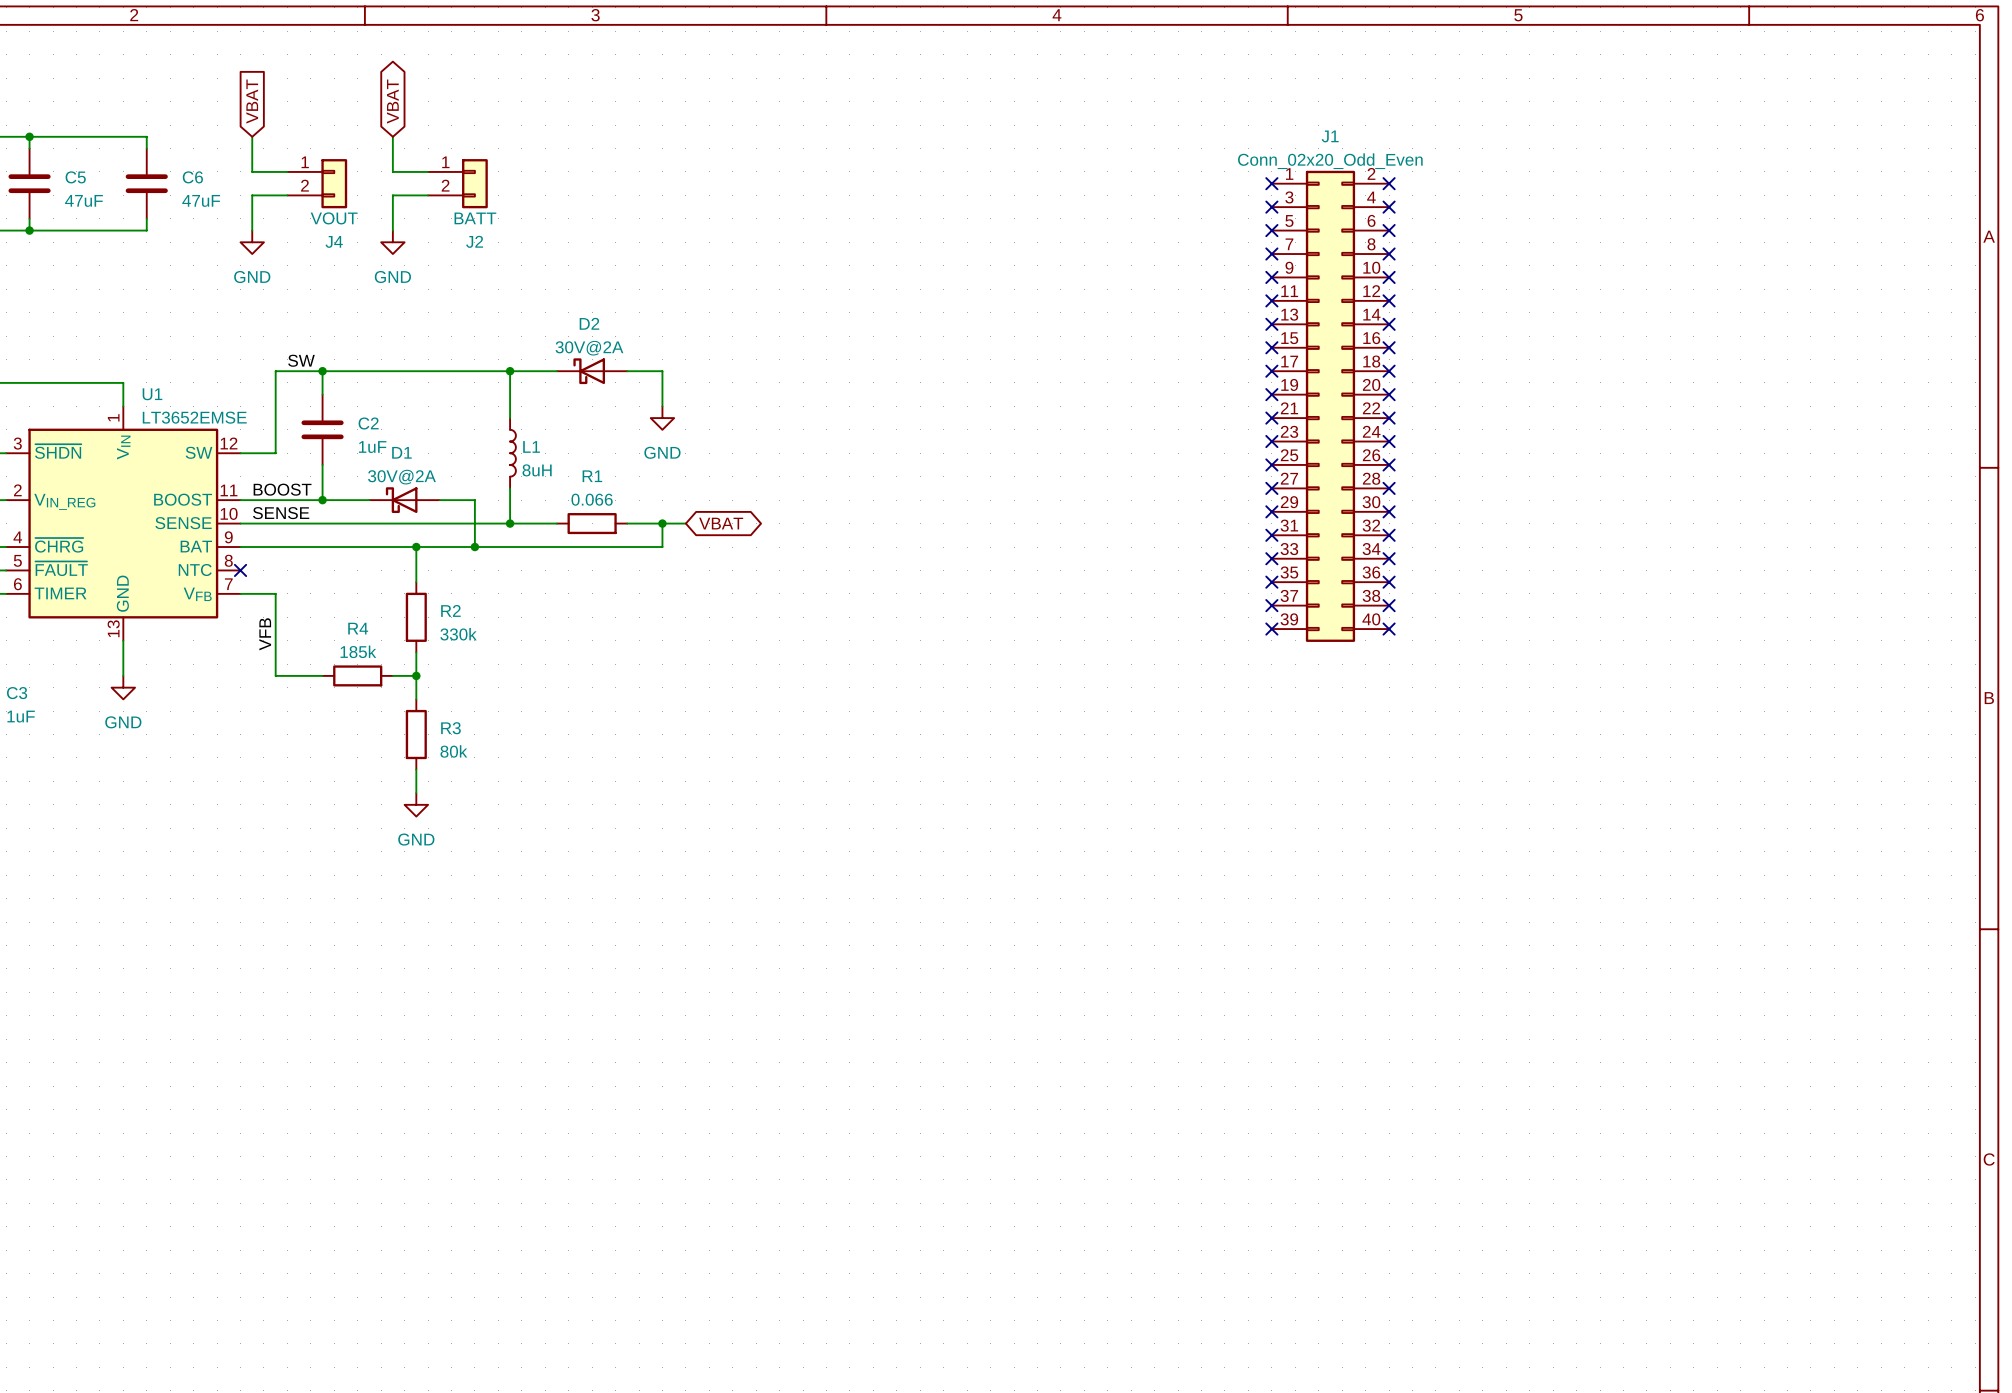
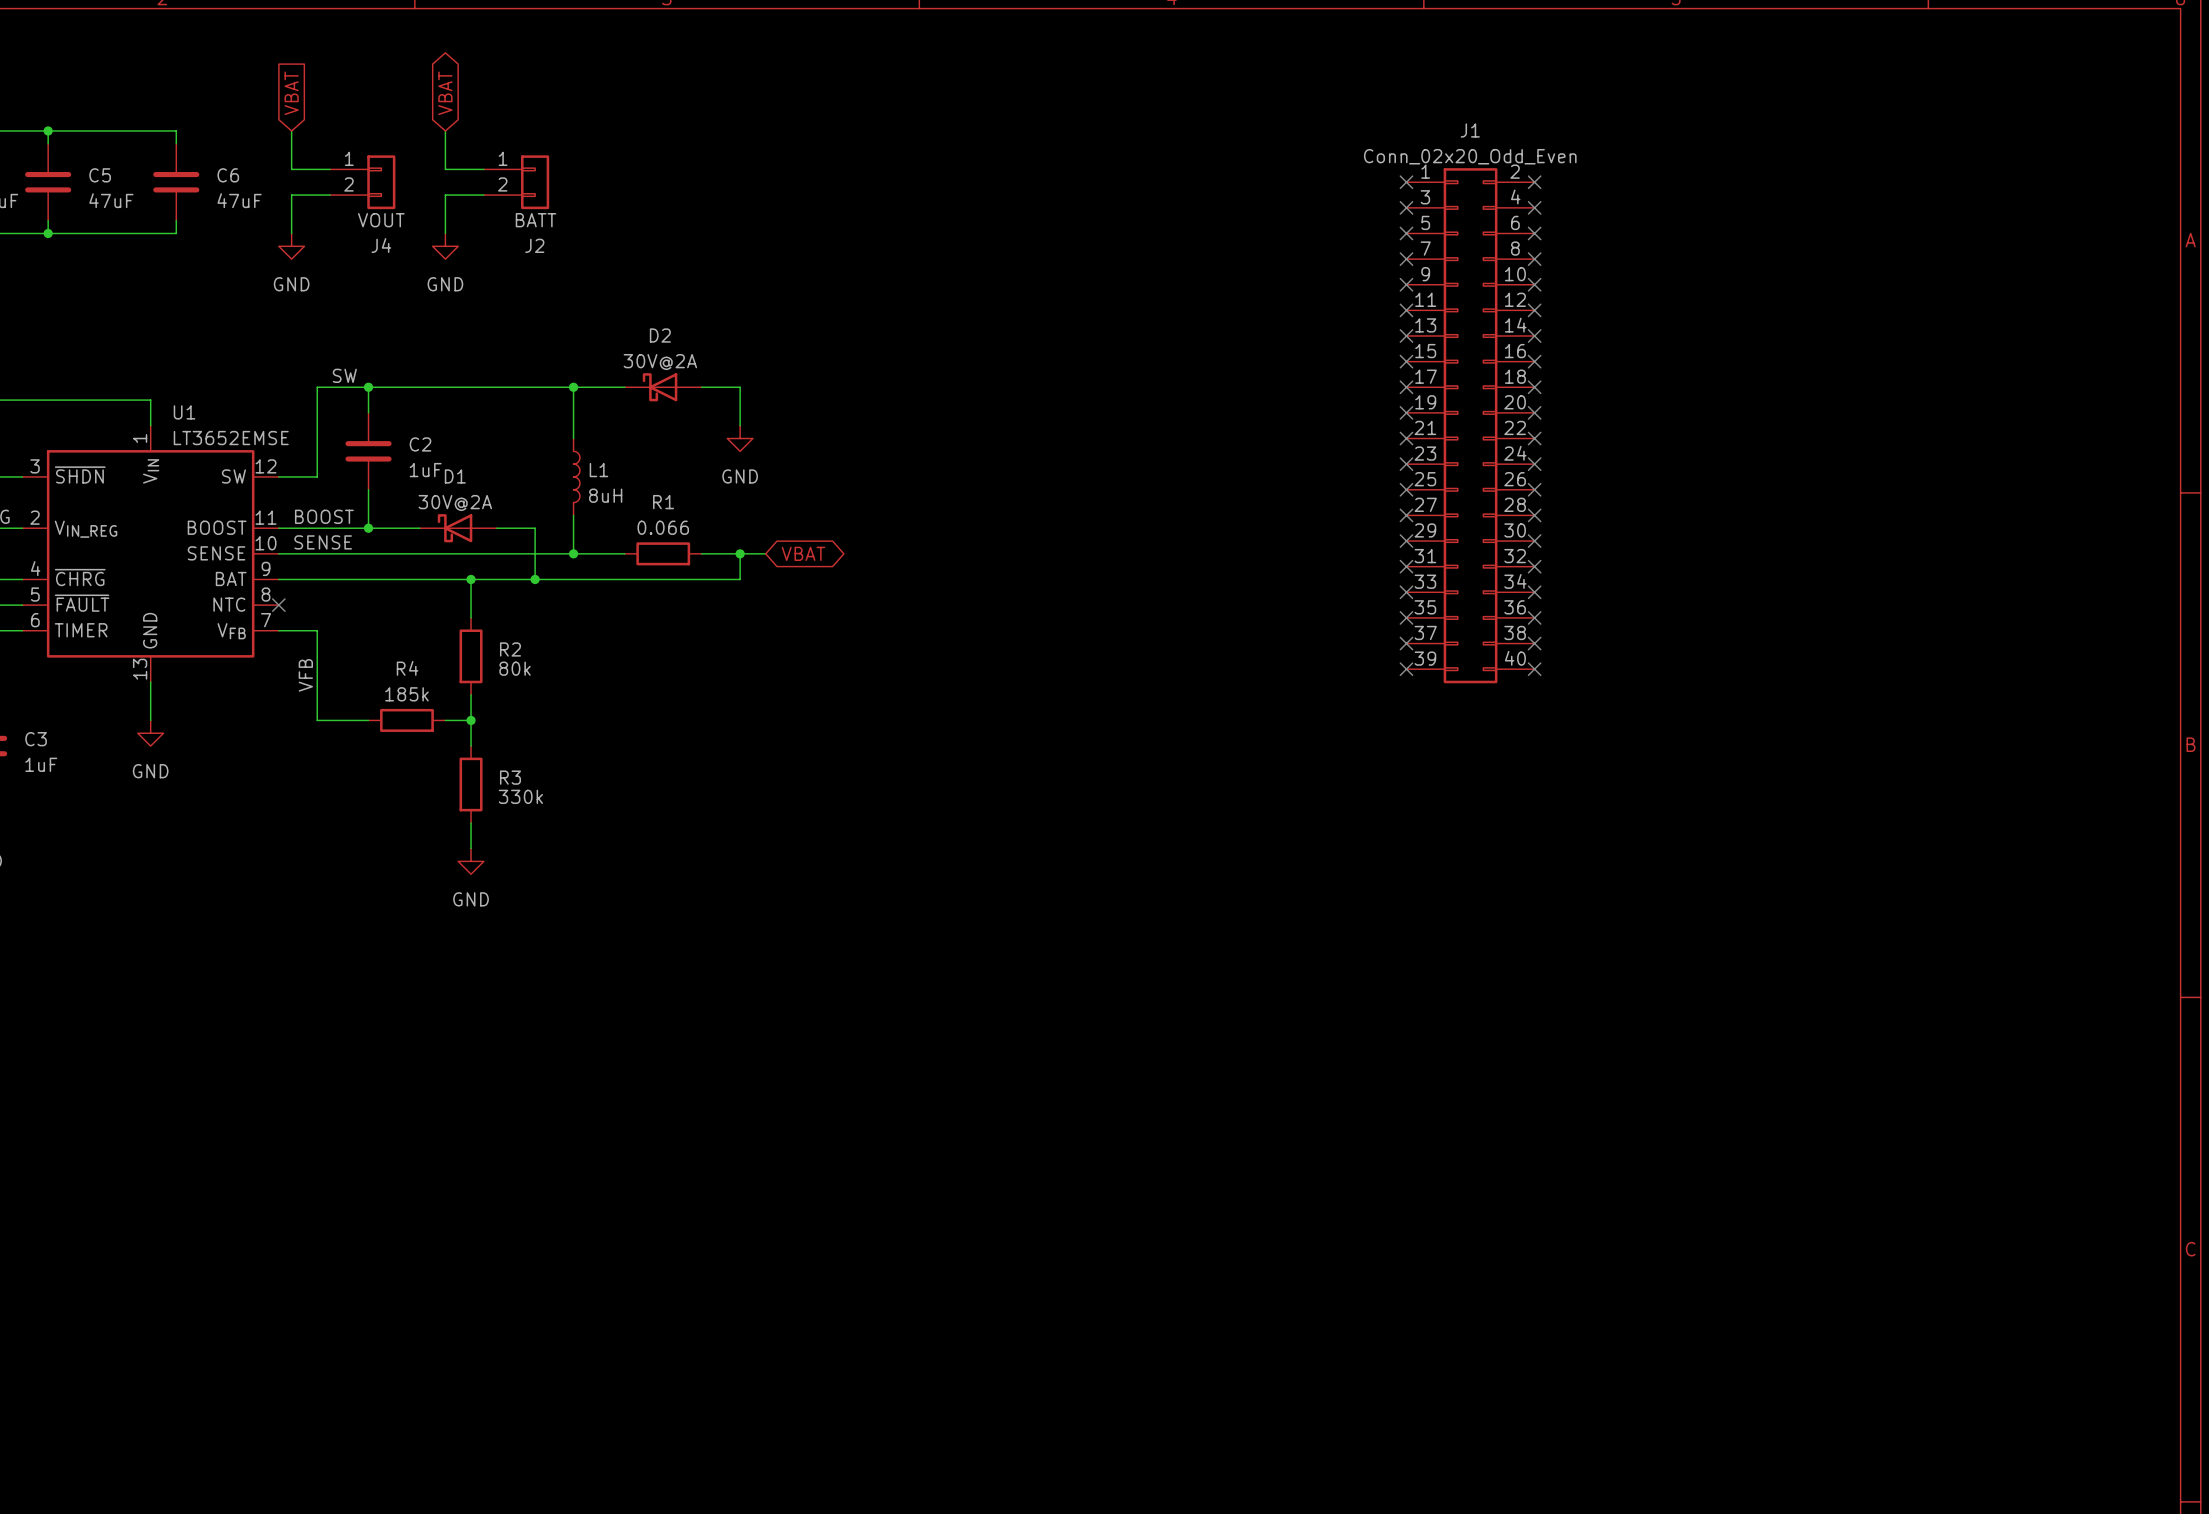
R2 value: 330k (458, 634) -> 80k (515, 668)
R3 value: 80k (453, 751) -> 330k (520, 796)

